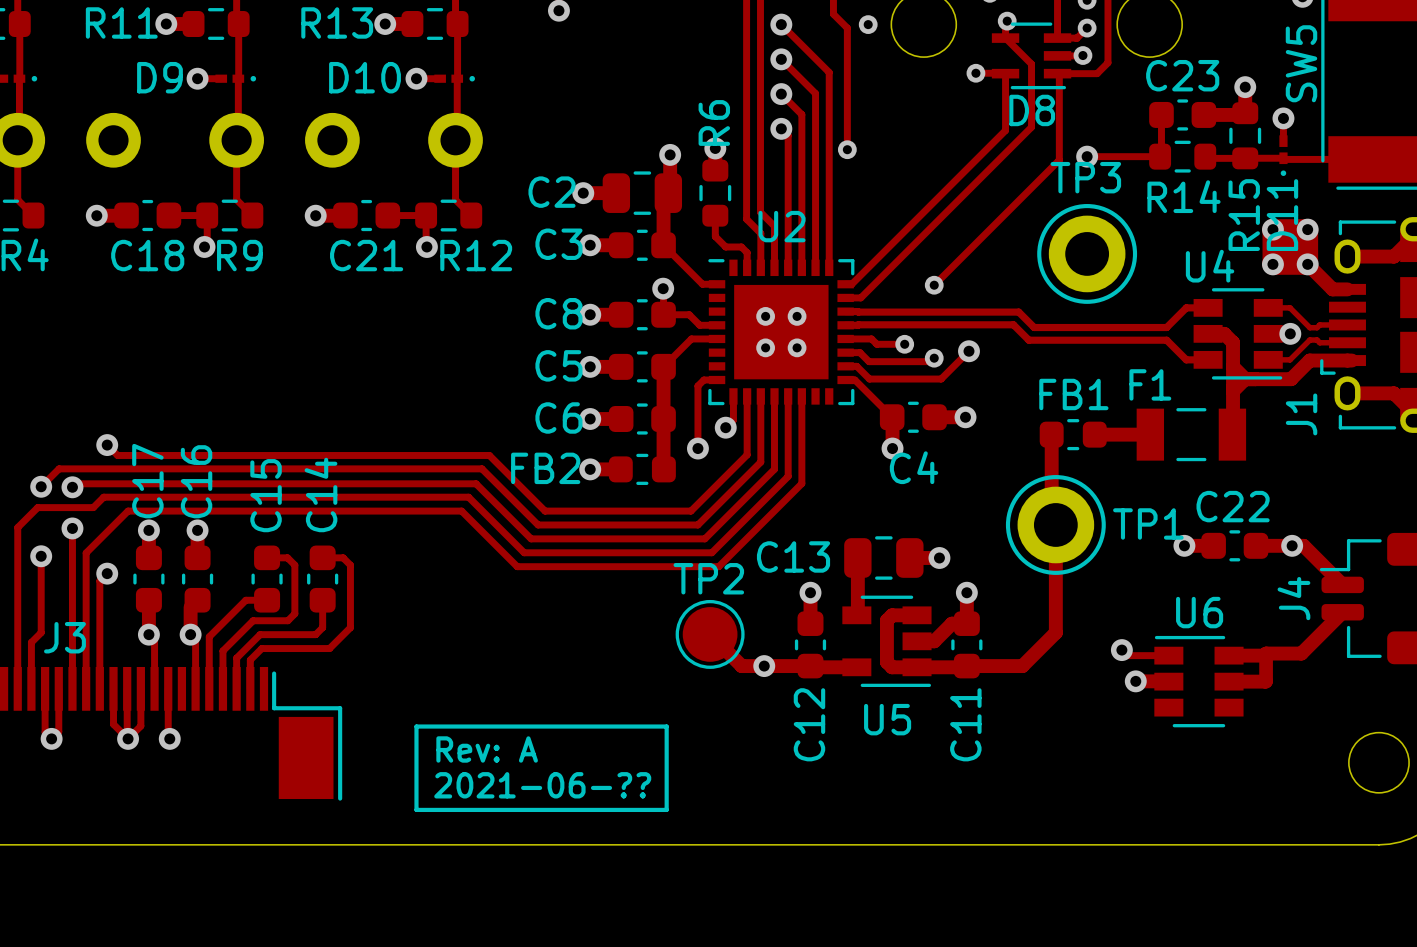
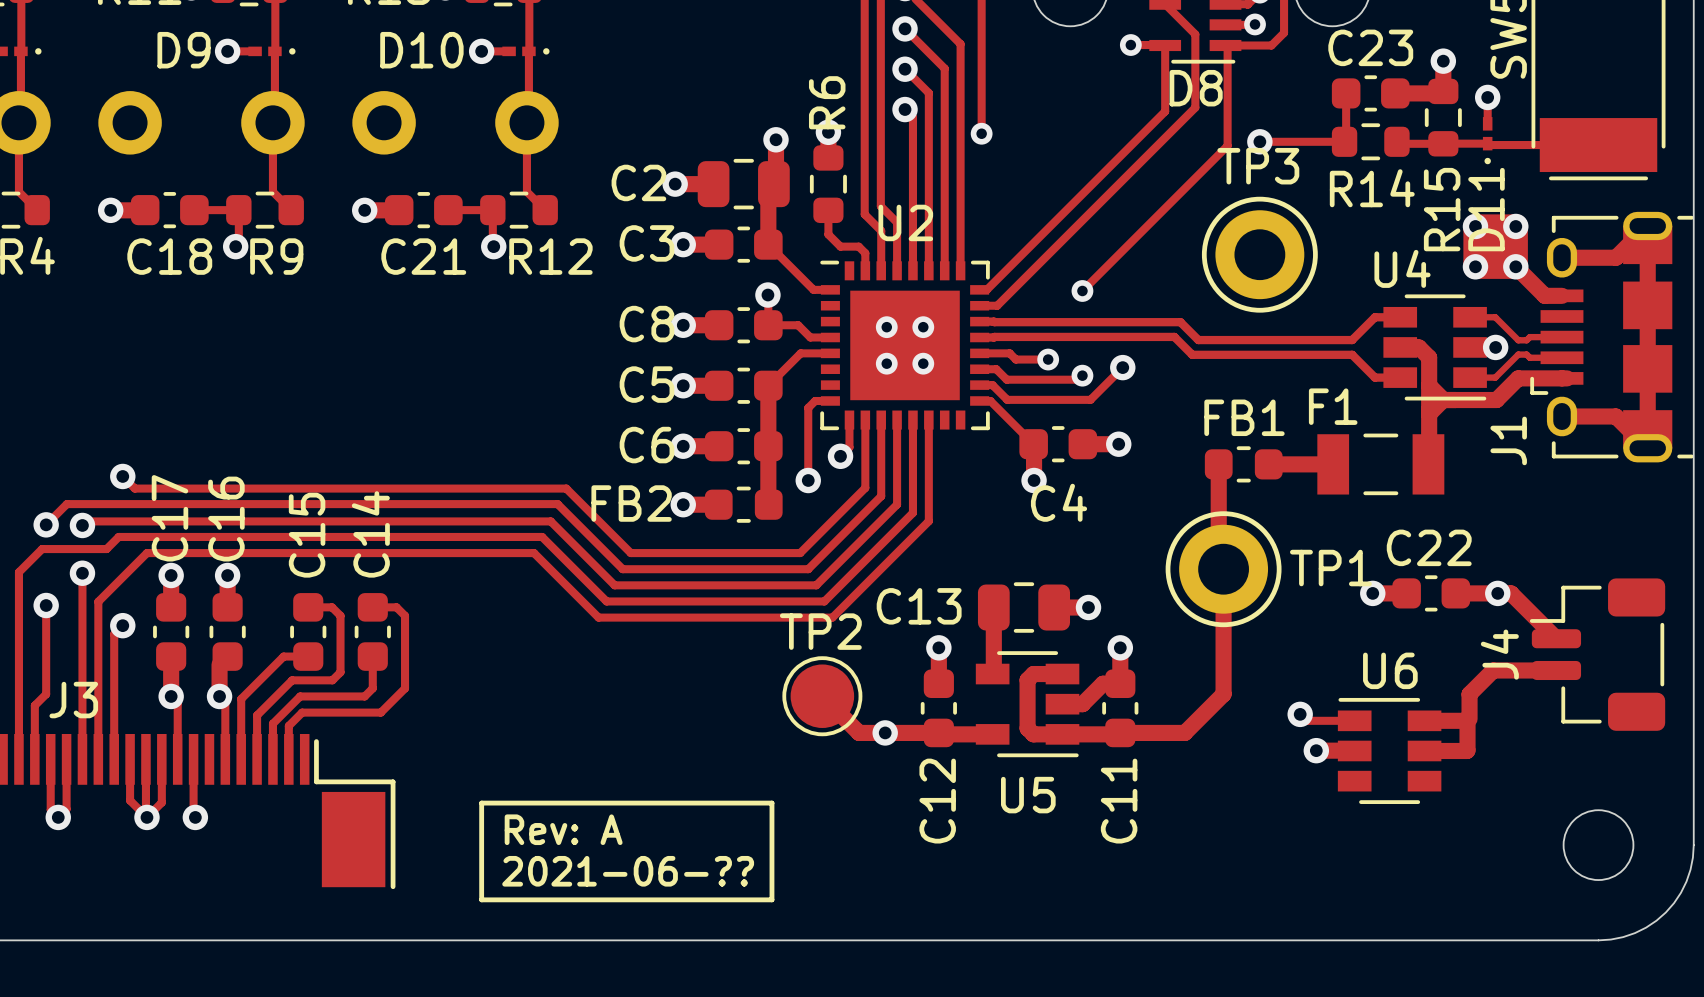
track: (1342, 612) (1301, 653) (1266, 653) (1264, 655) -> (1556, 670) (1493, 670) (1469, 694) (1469, 719)

